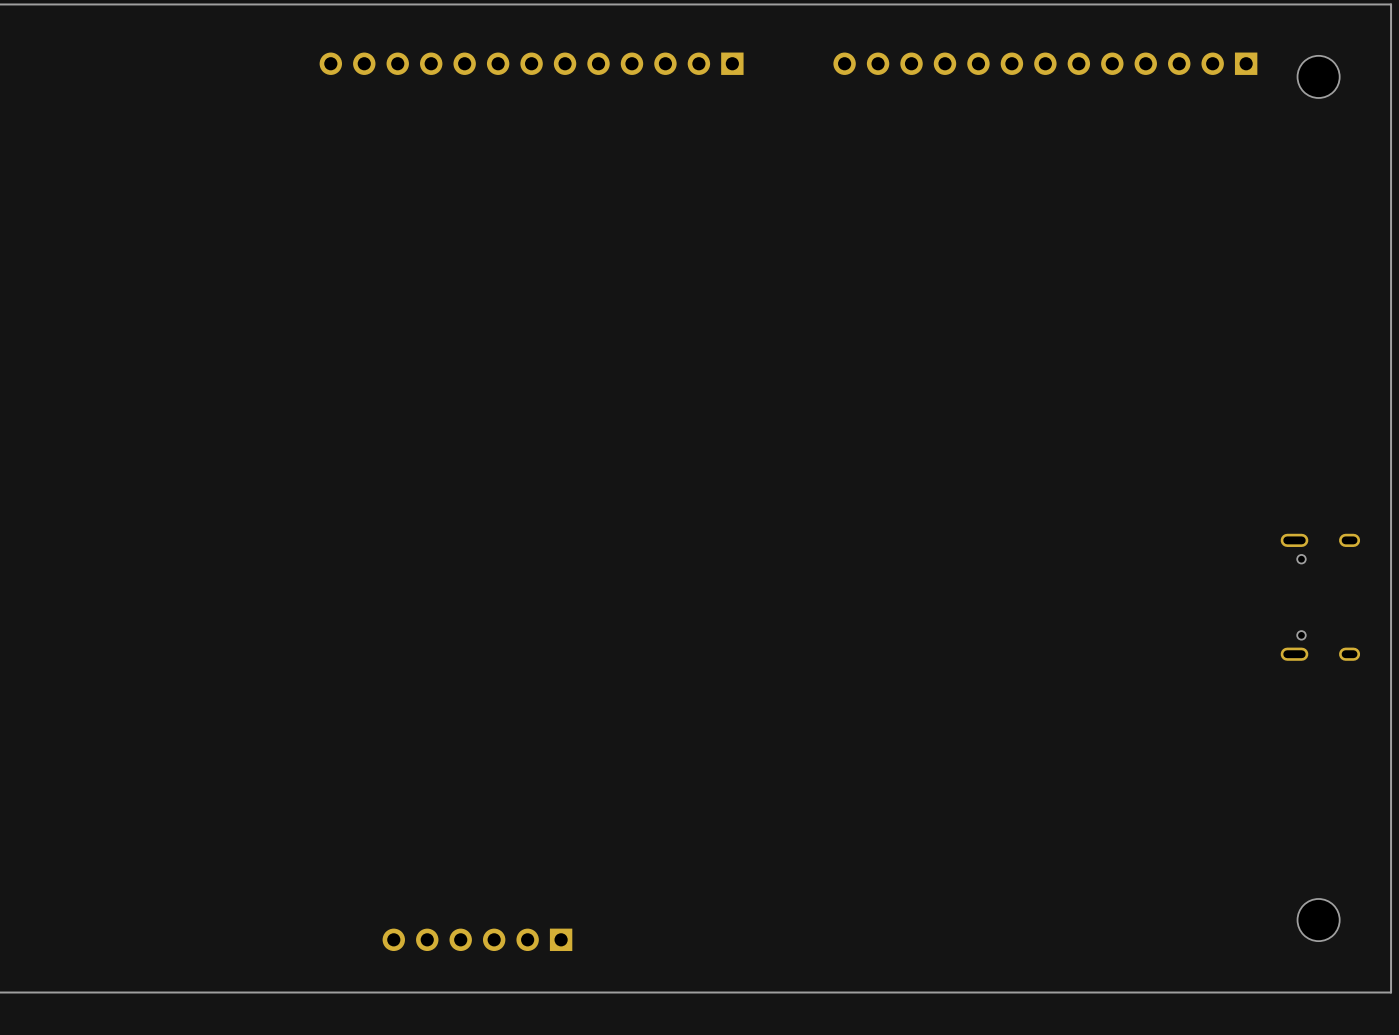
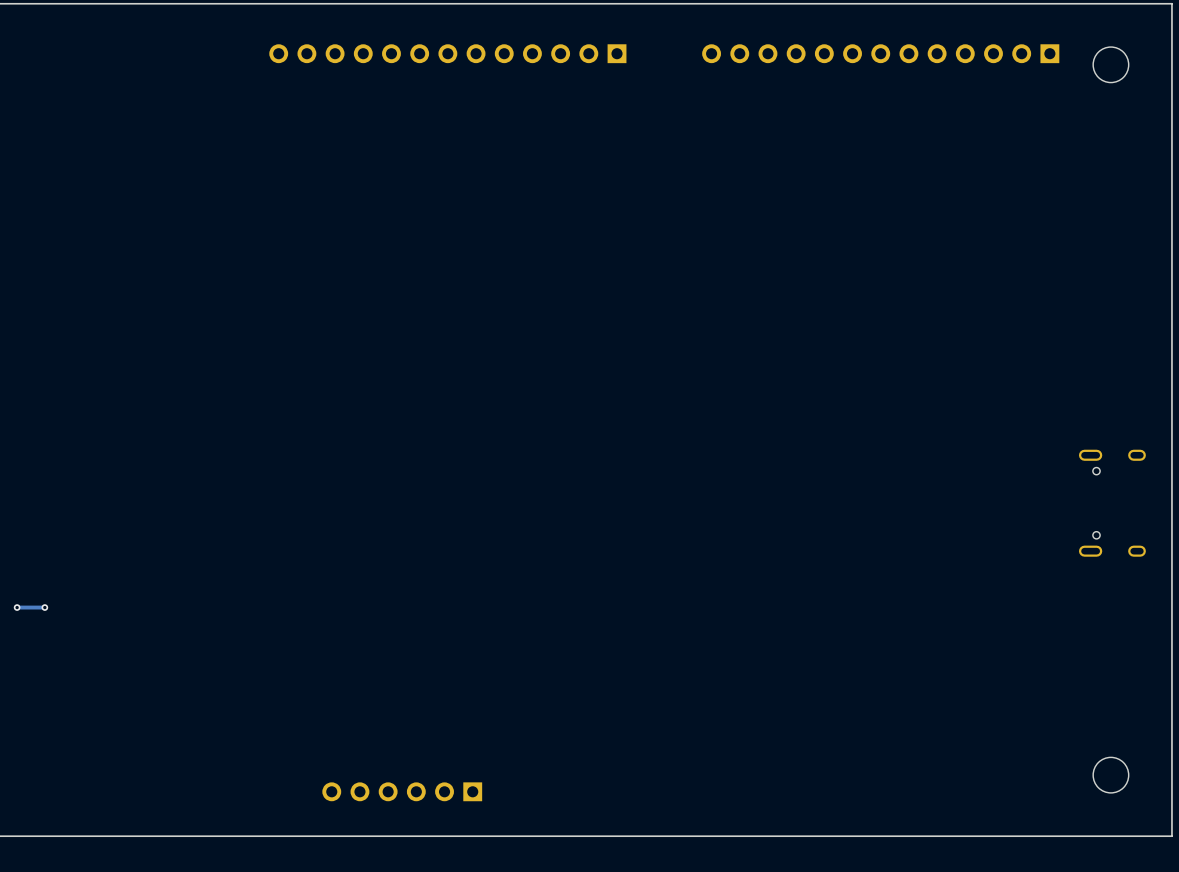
via: none -> (17, 607)
track: none -> (44, 607) (17, 607)
via: none -> (44, 607)

